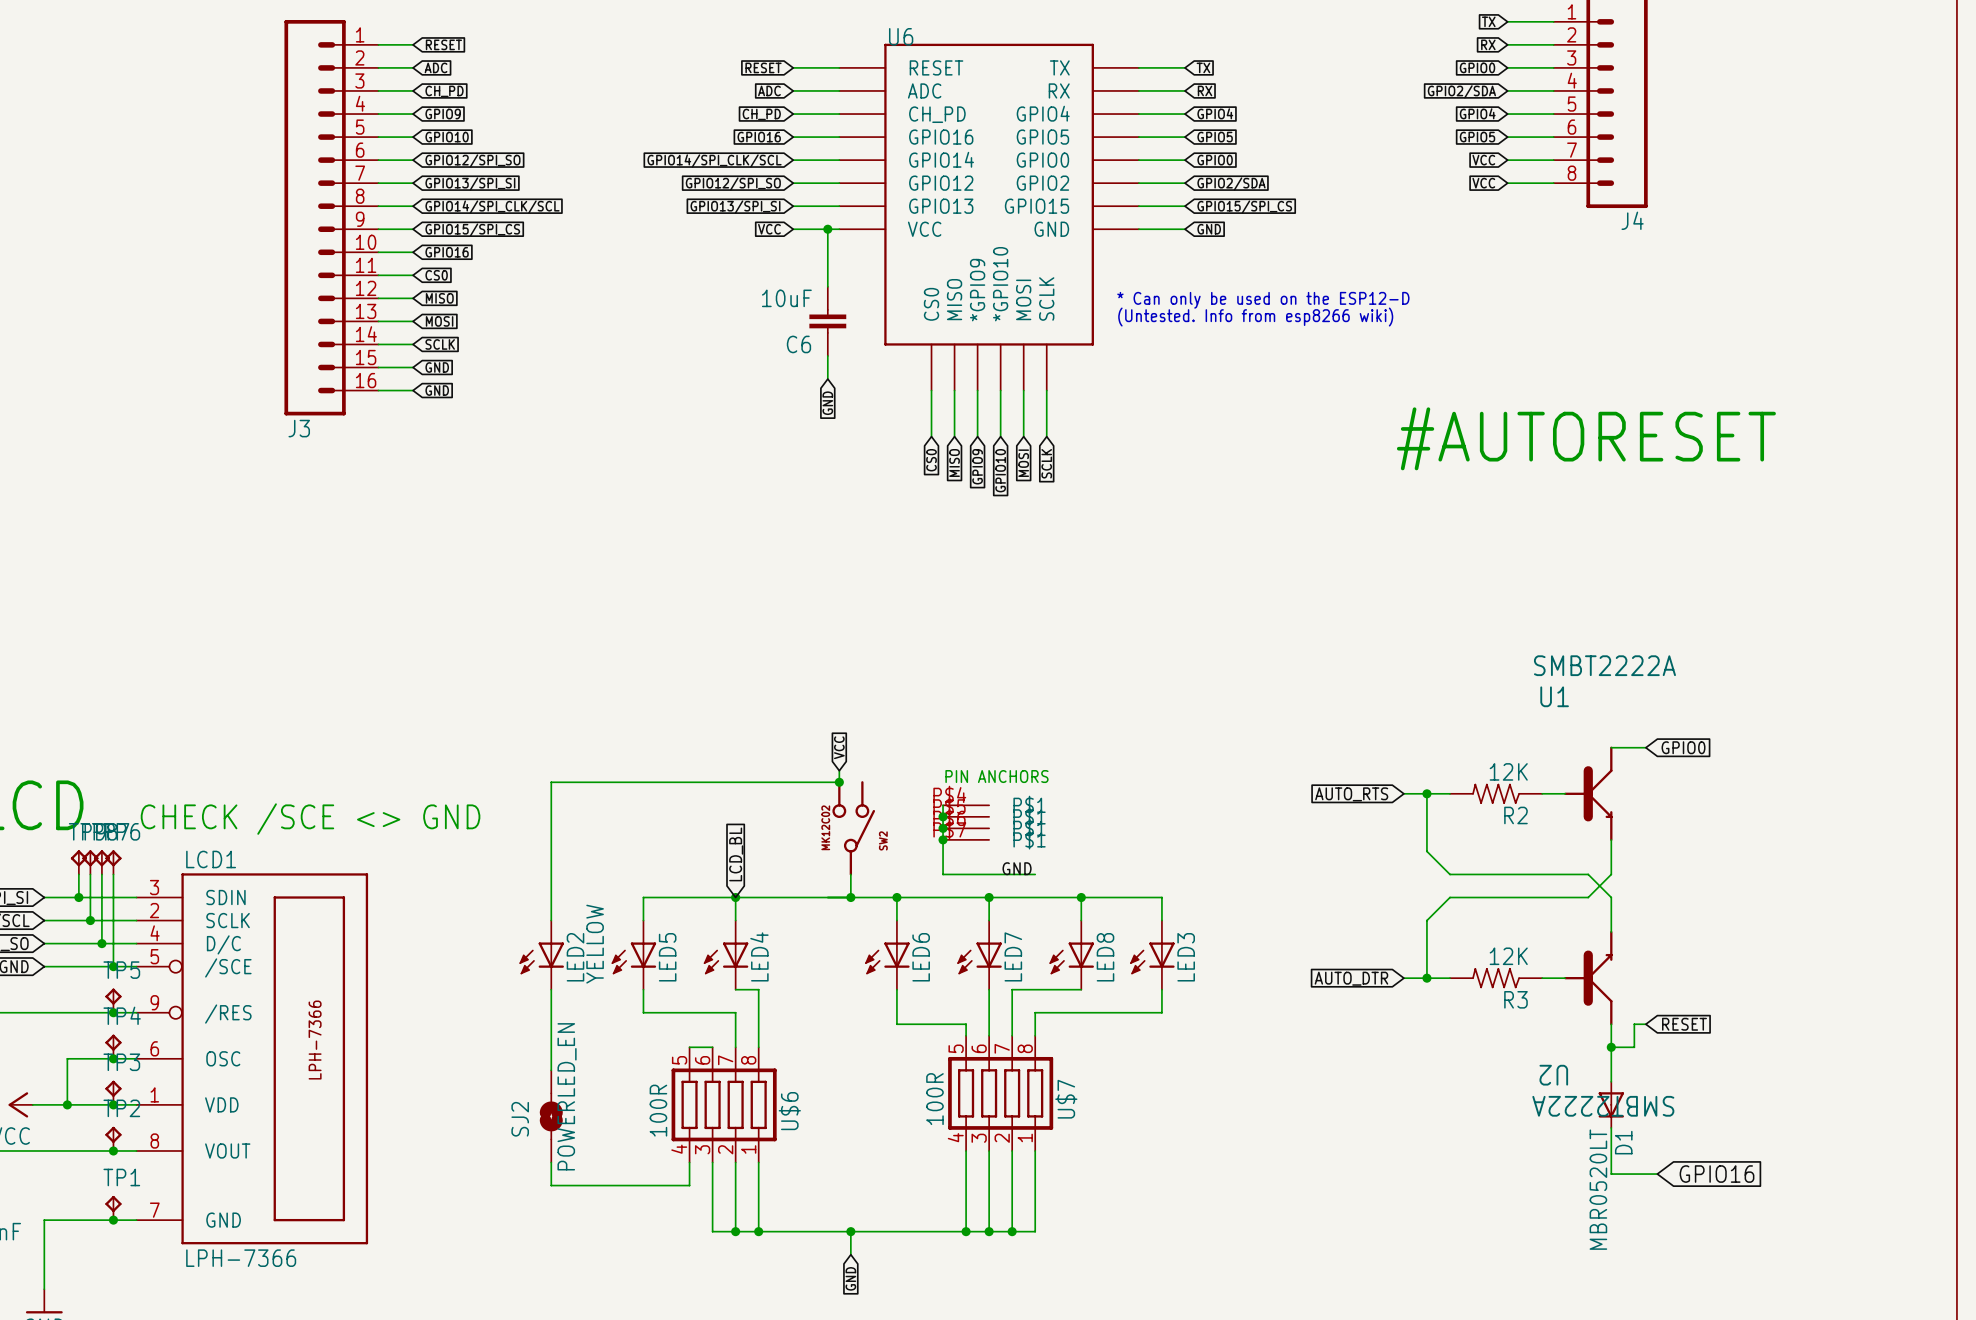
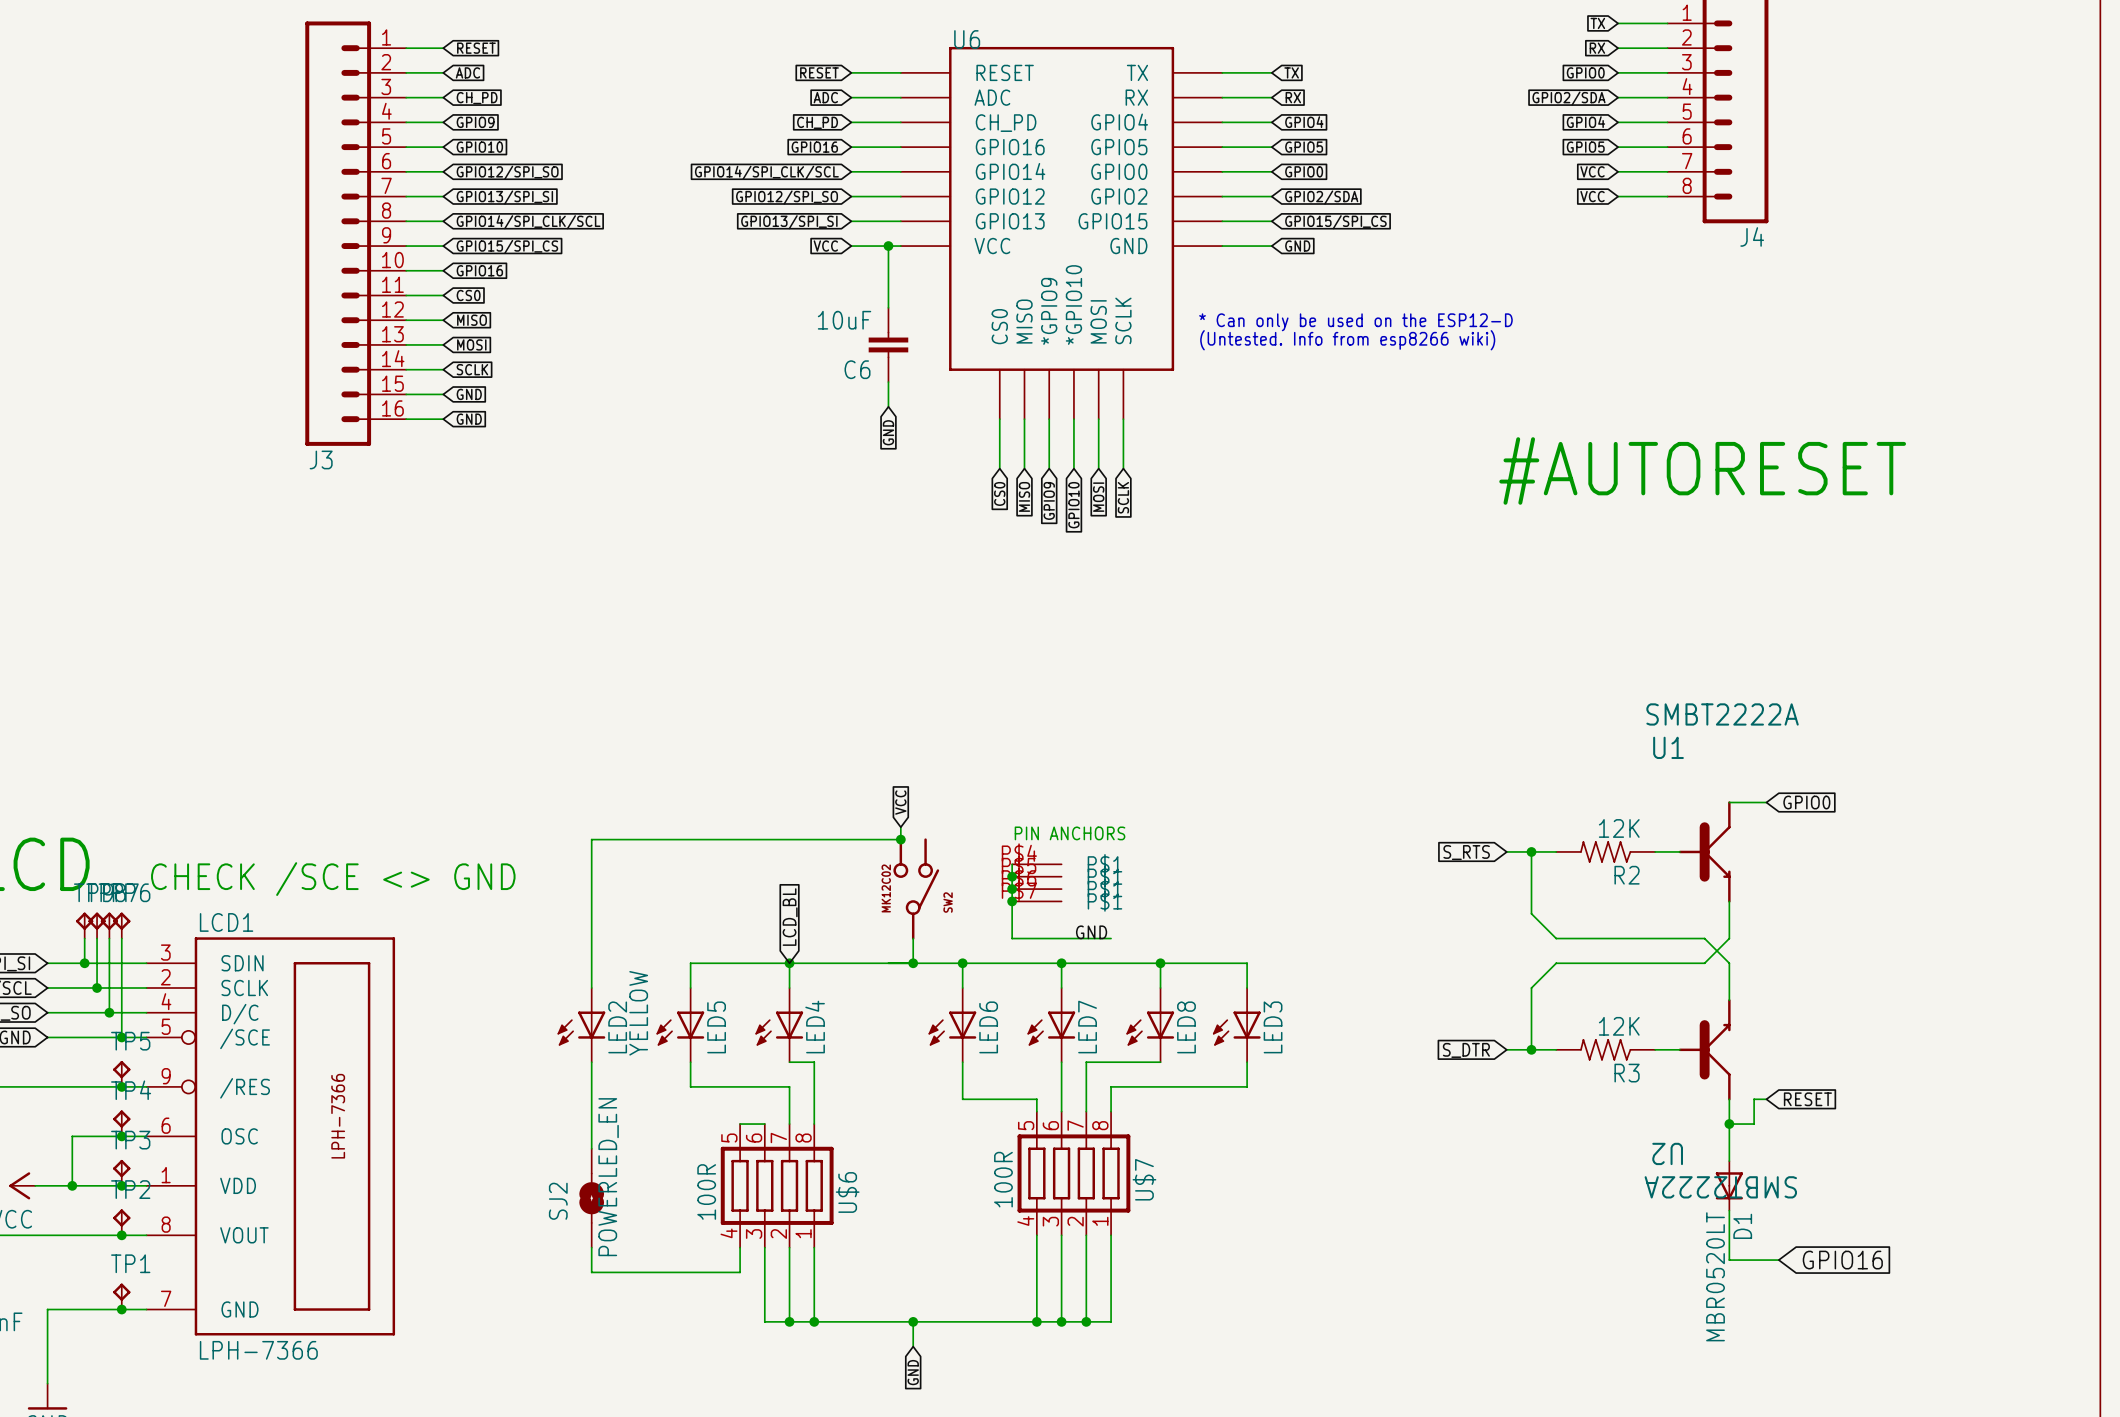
global label: AUTO_RTS (1351, 794) -> S_RTS (1466, 852)
global label: AUTO_DTR (1351, 978) -> S_DTR (1466, 1050)

